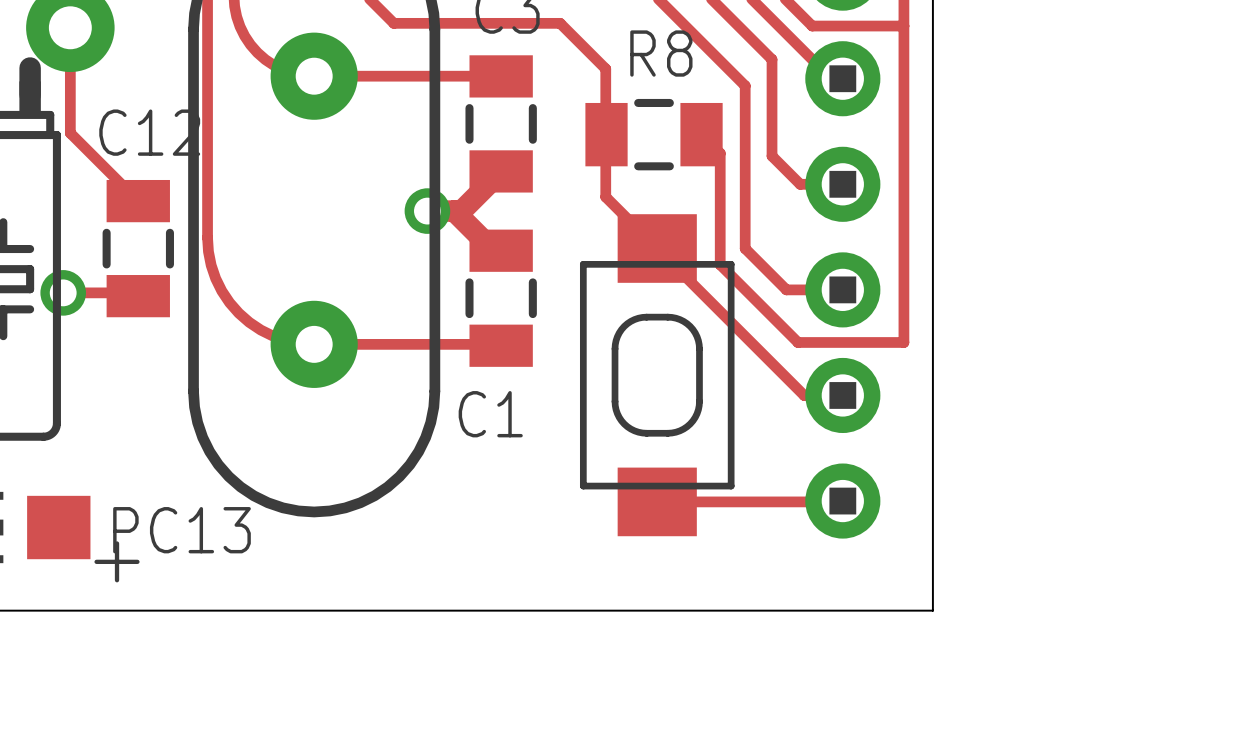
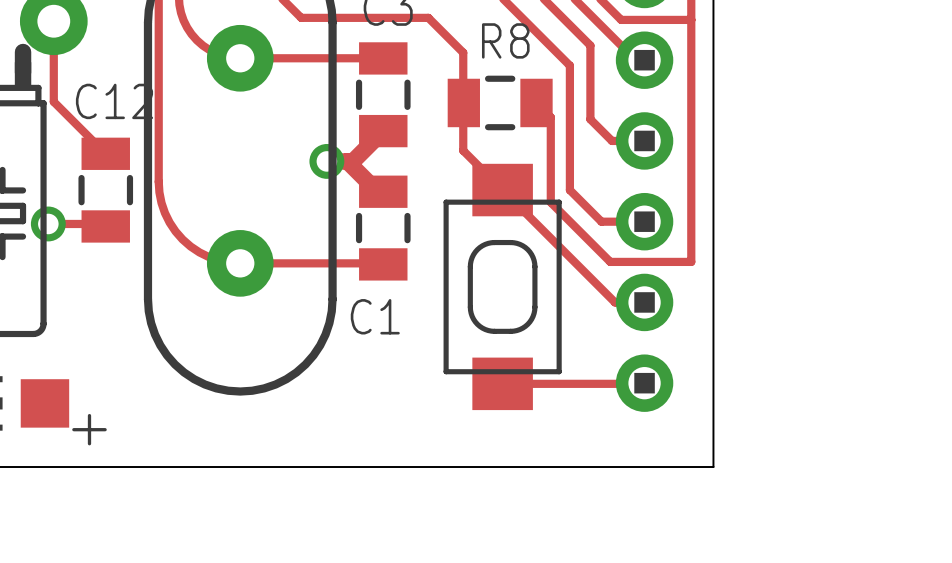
text: PC13 (182, 530) -> none

